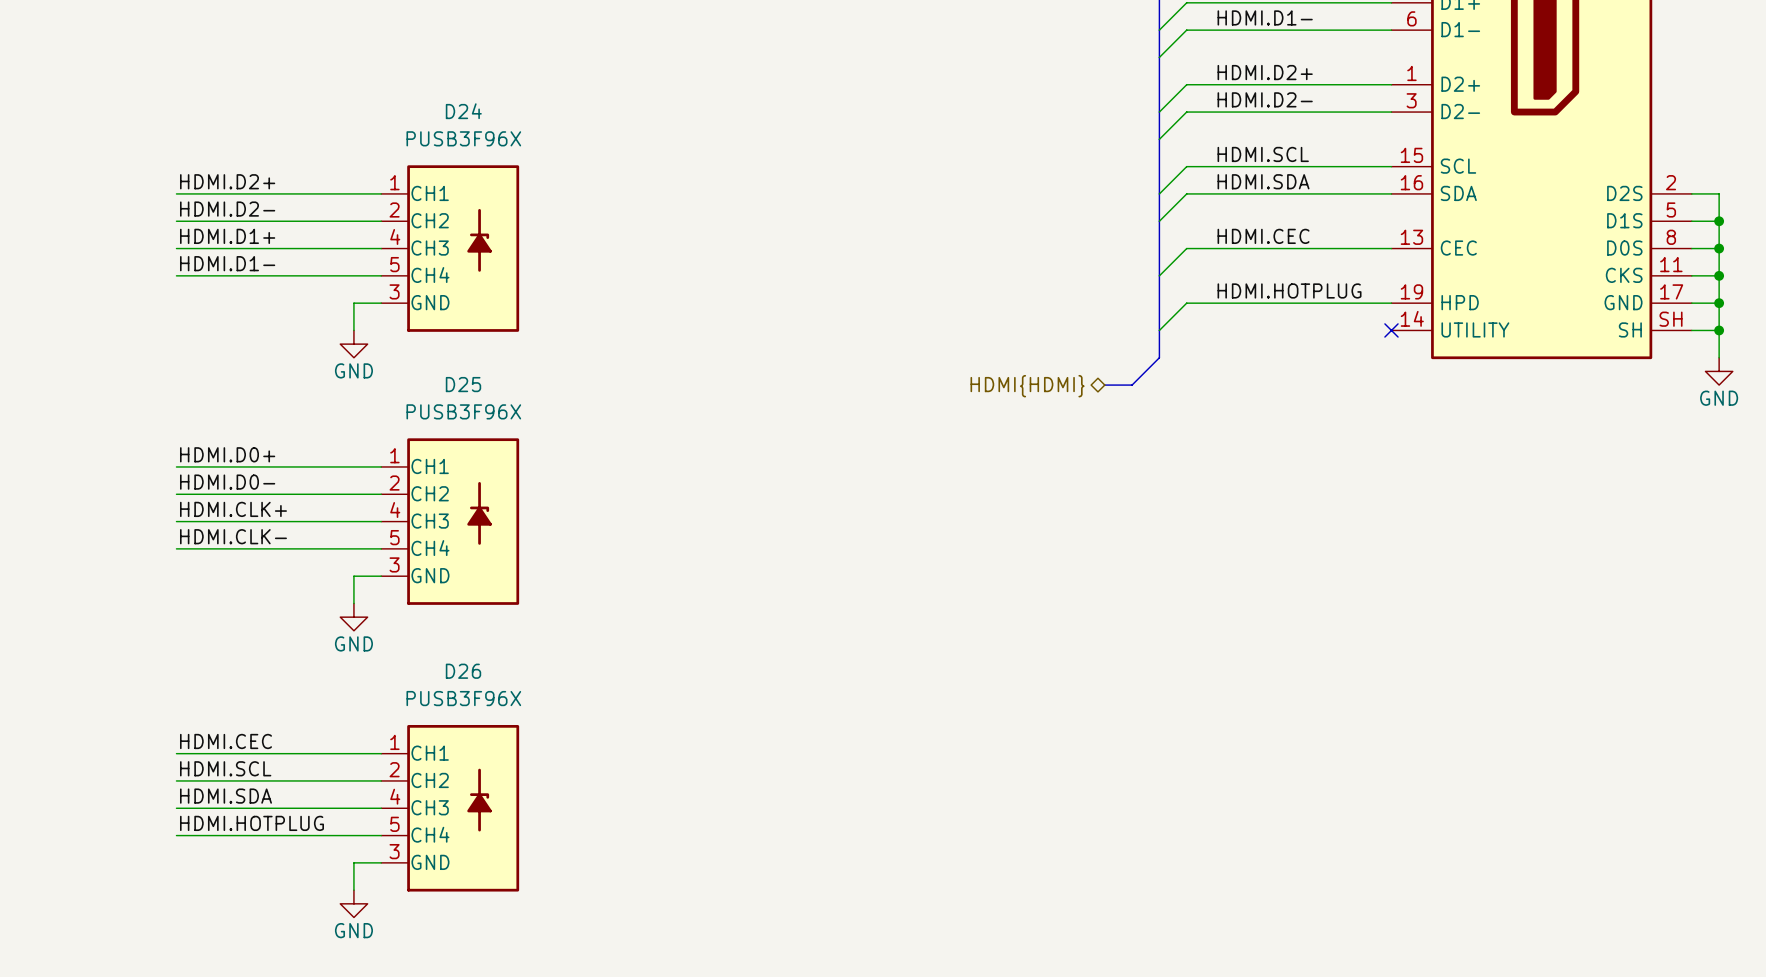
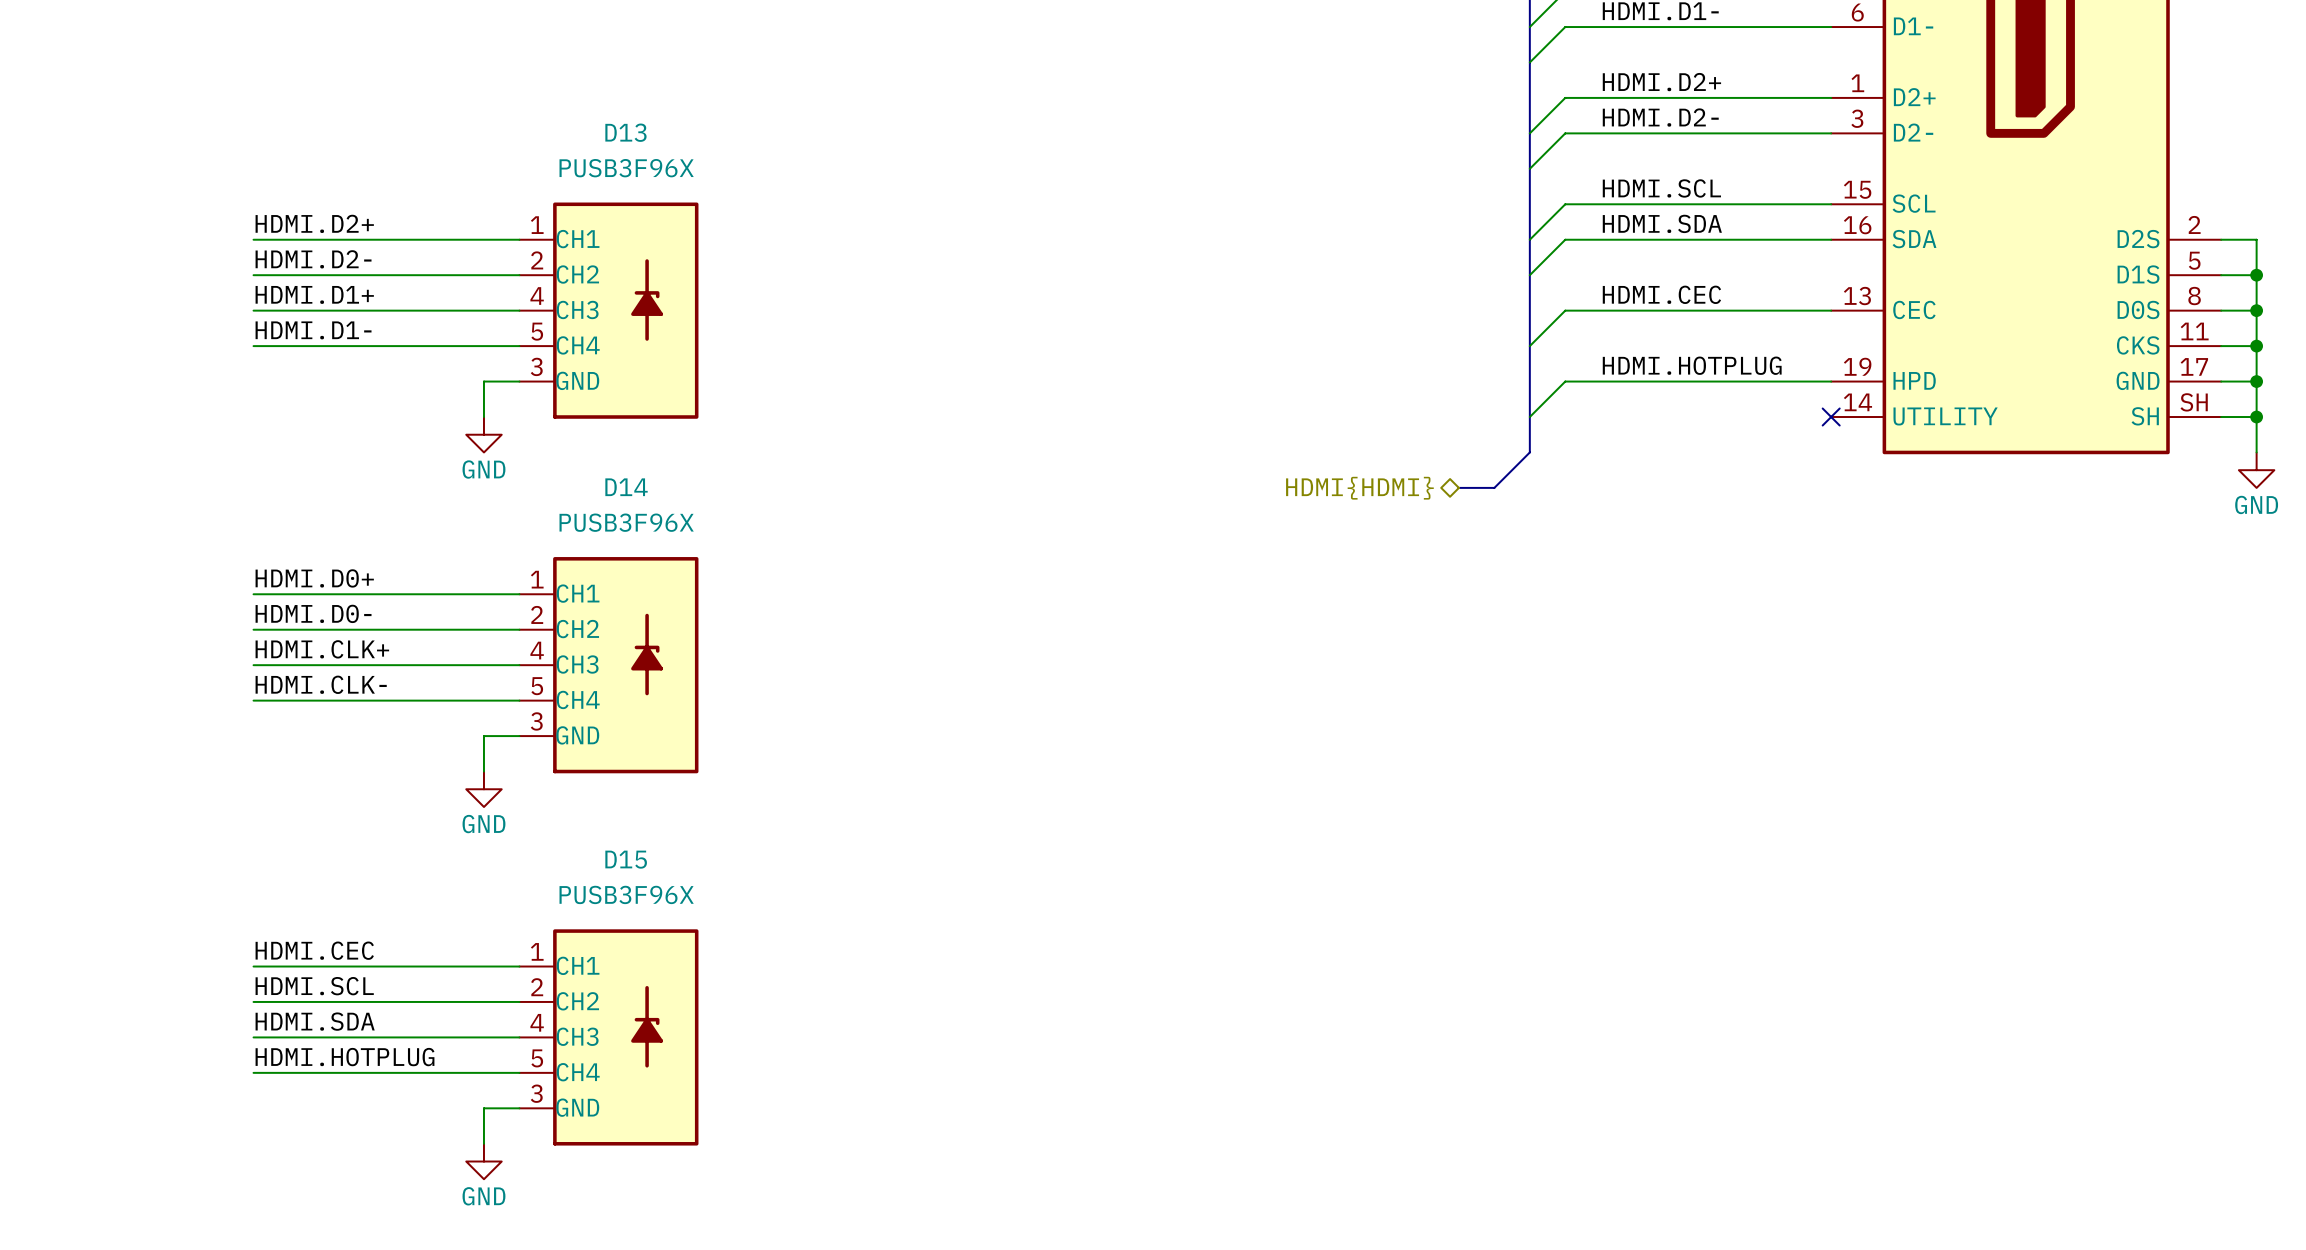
D24 name: D24 (463, 111) -> D13 (625, 132)
D25 name: D25 (463, 384) -> D14 (626, 487)
D26 name: D26 (463, 671) -> D15 (626, 859)

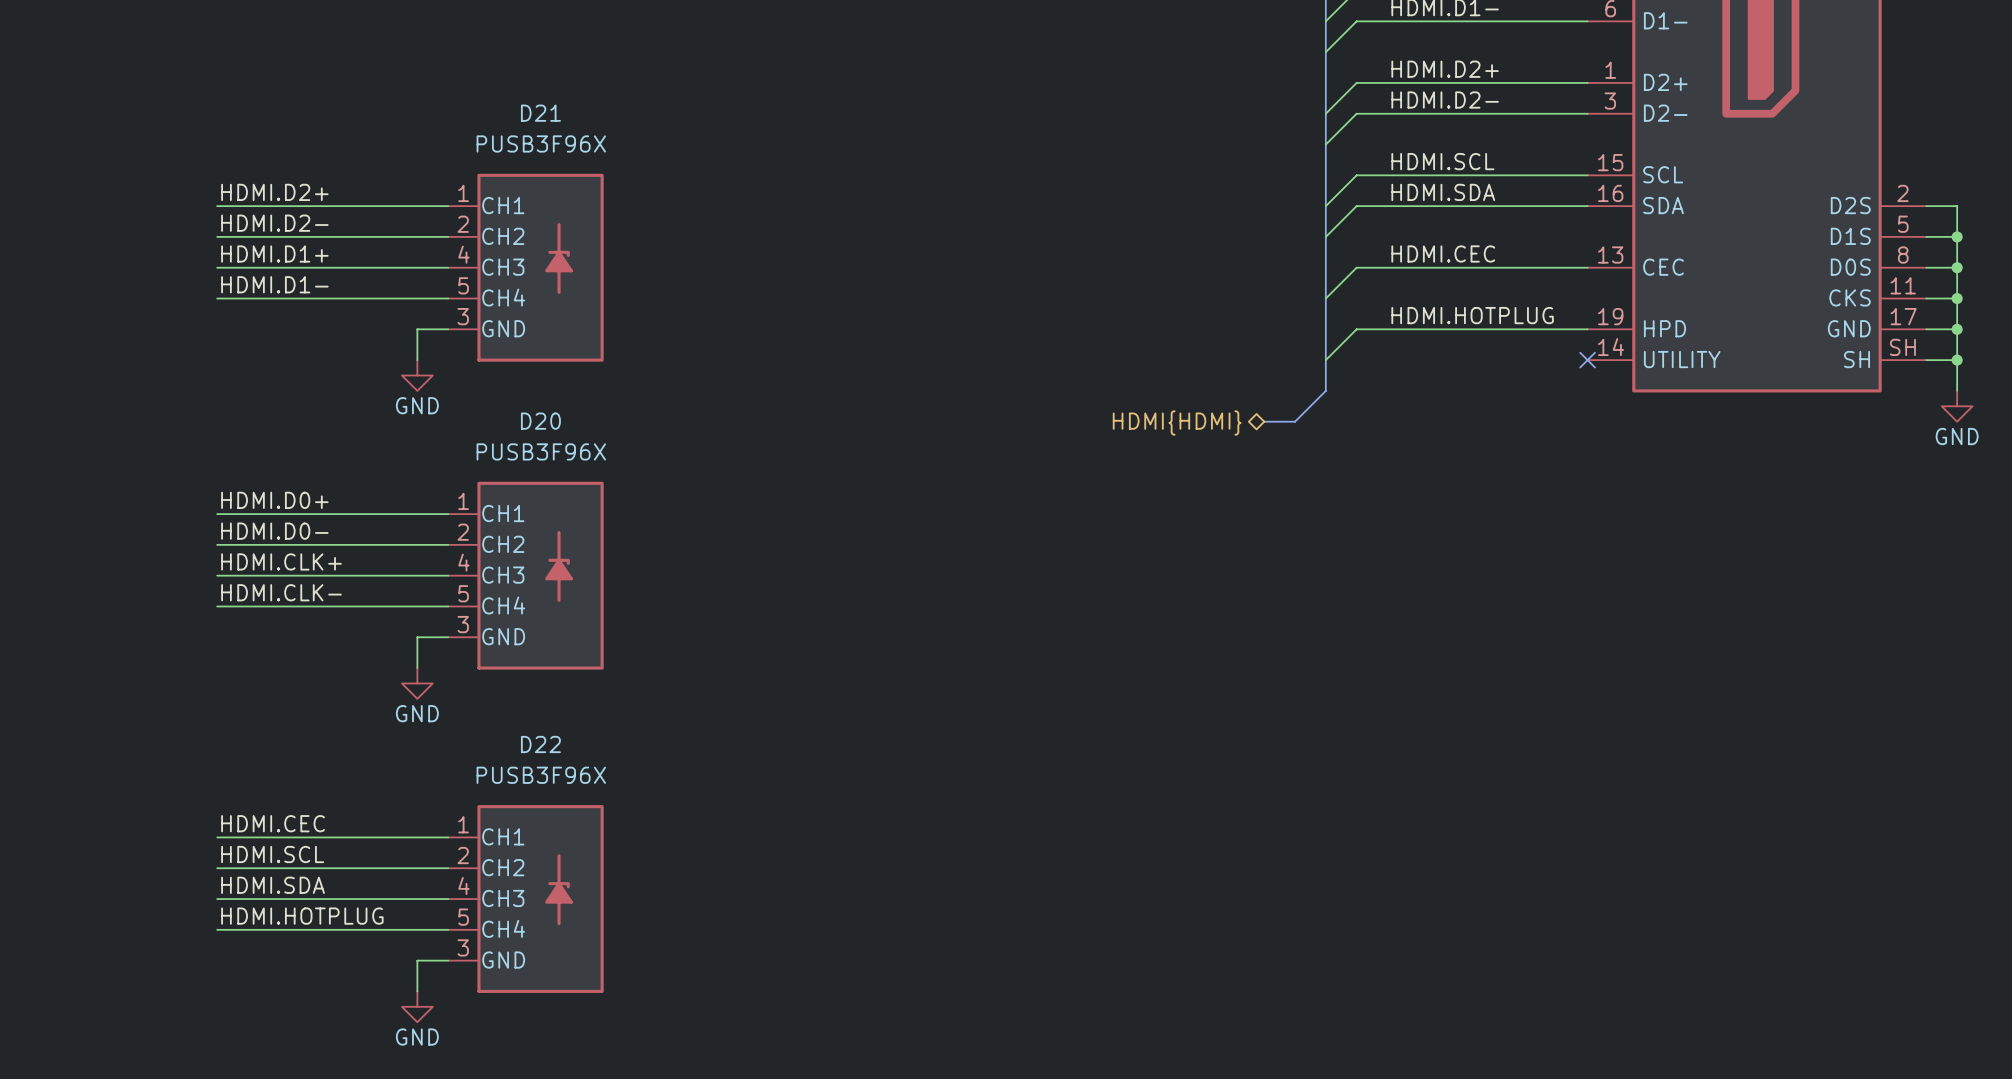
D13 name: D13 (625, 132) -> D21 (540, 113)
D14 name: D14 (626, 487) -> D20 (540, 421)
D15 name: D15 (626, 859) -> D22 (540, 744)

